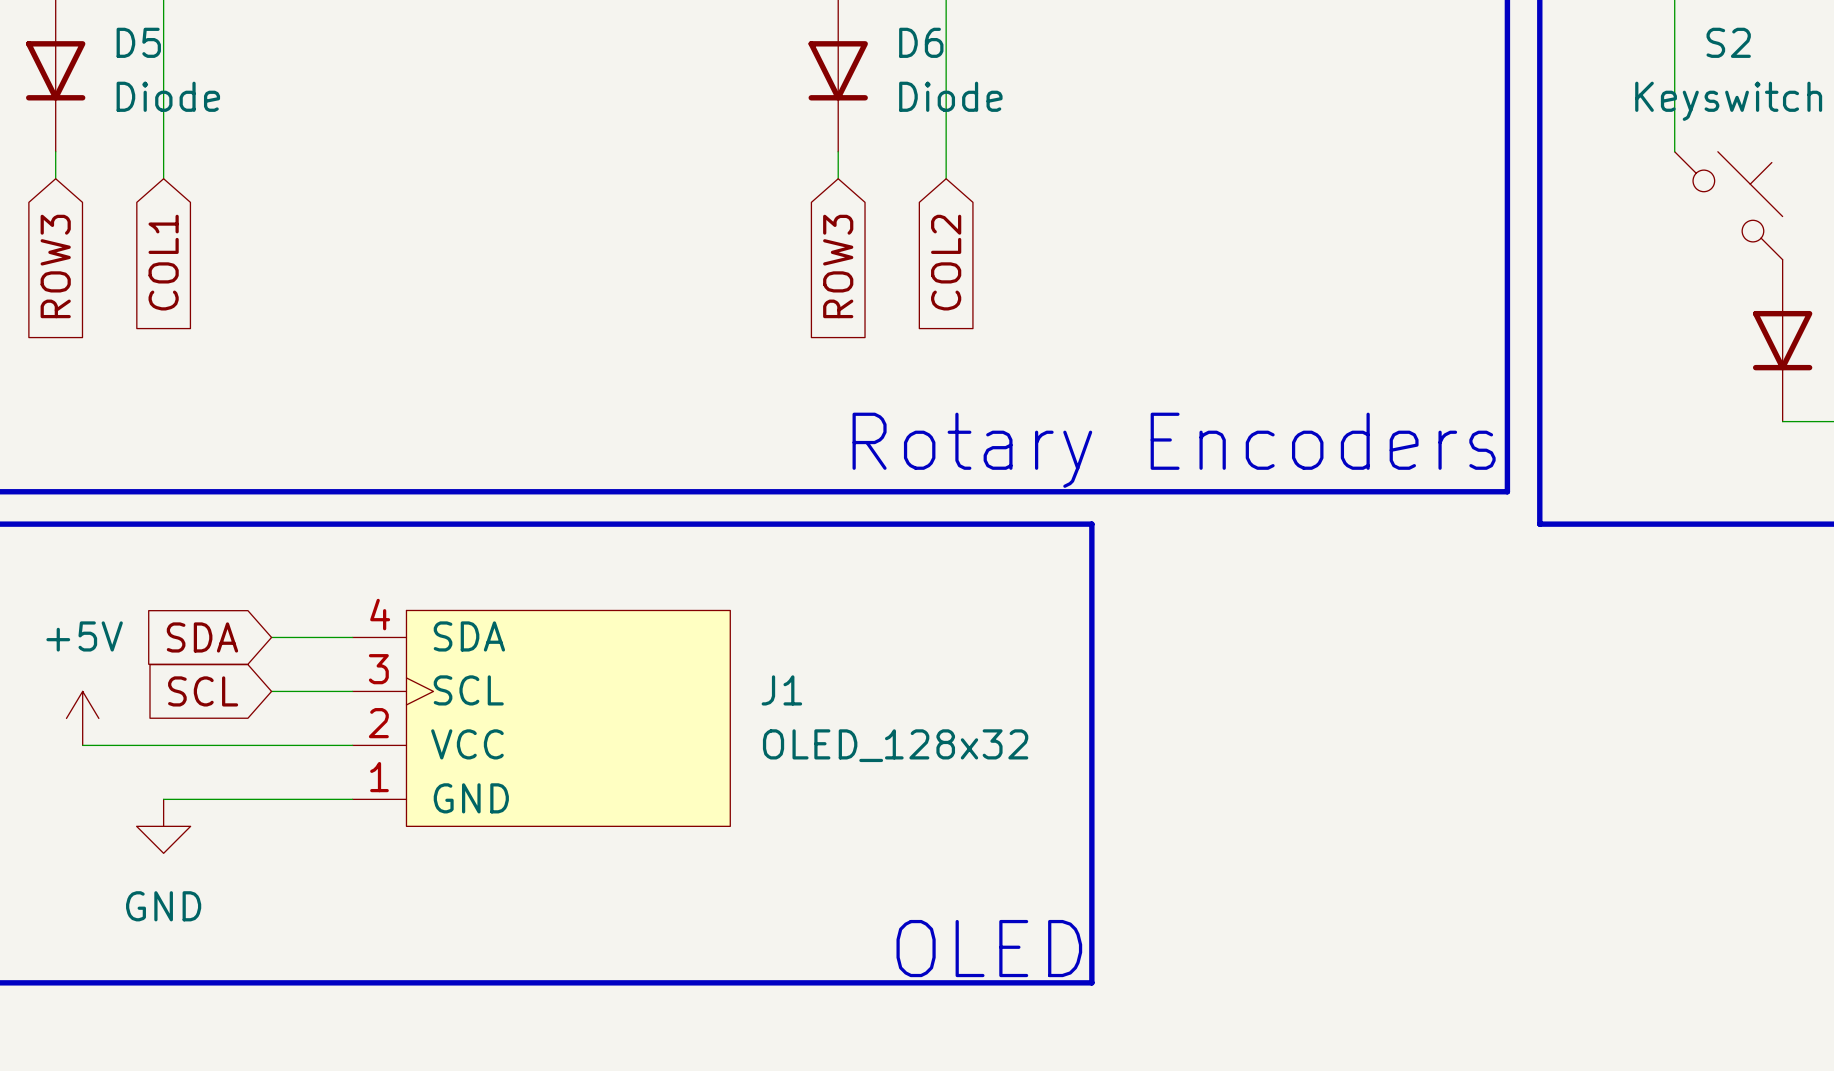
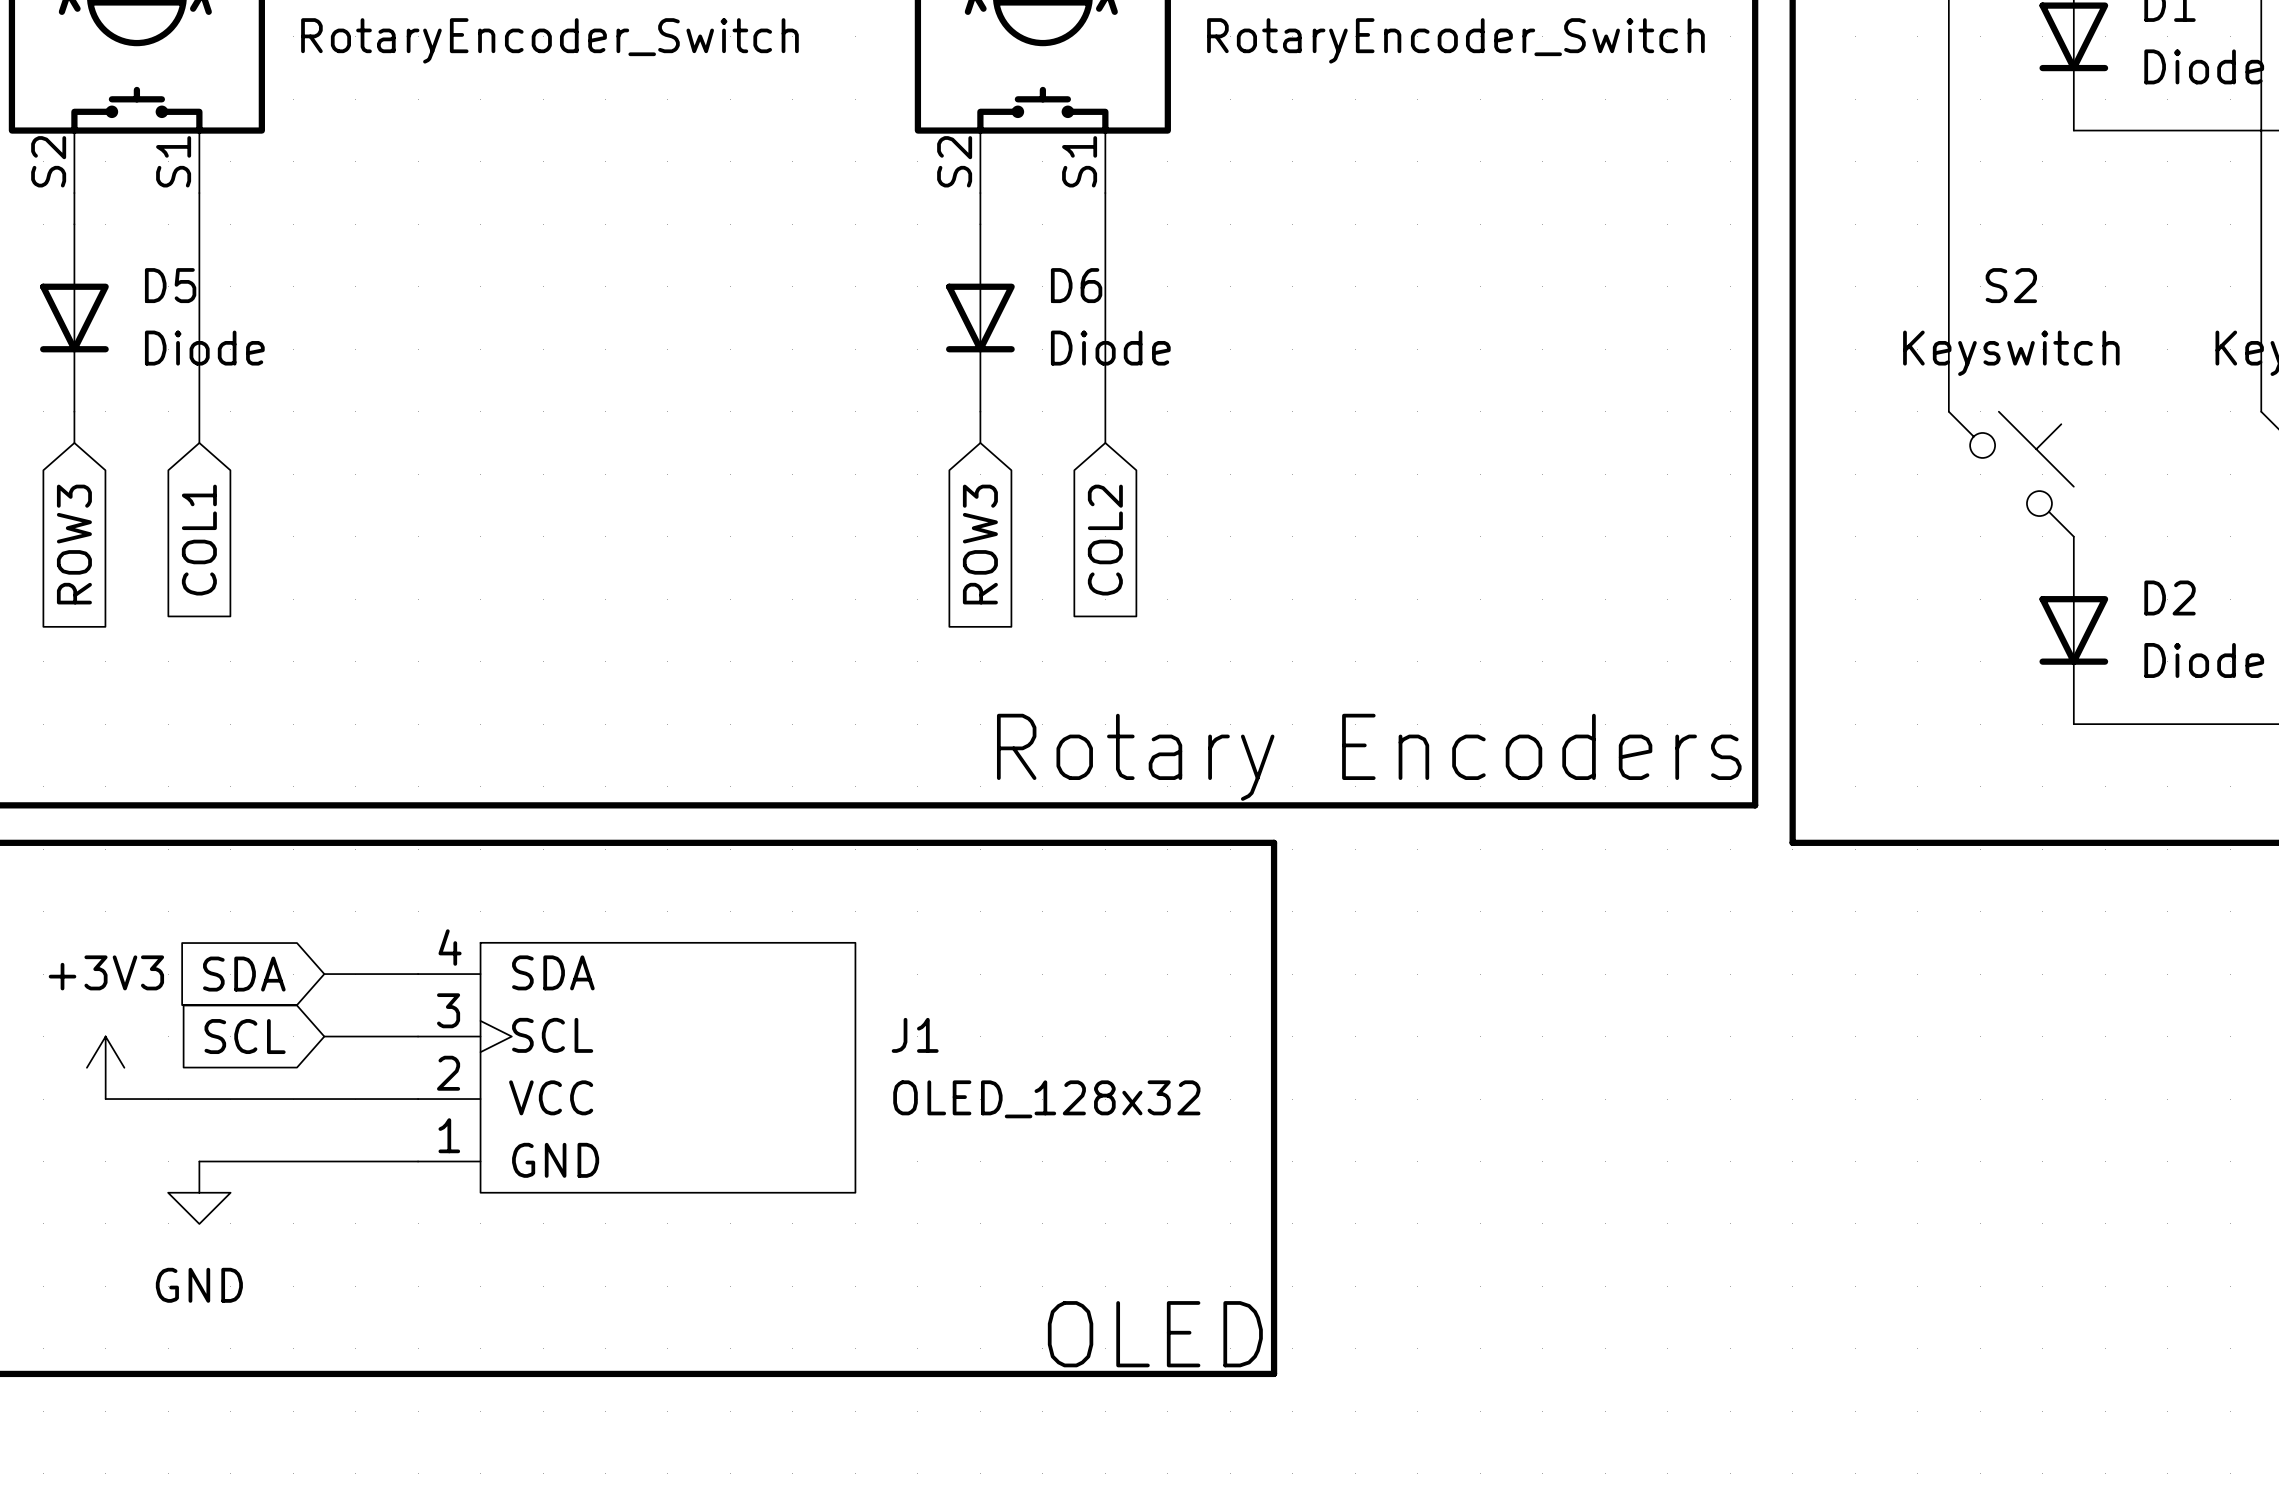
power symbol: +5V (82, 718) -> +3V3 (105, 1067)

